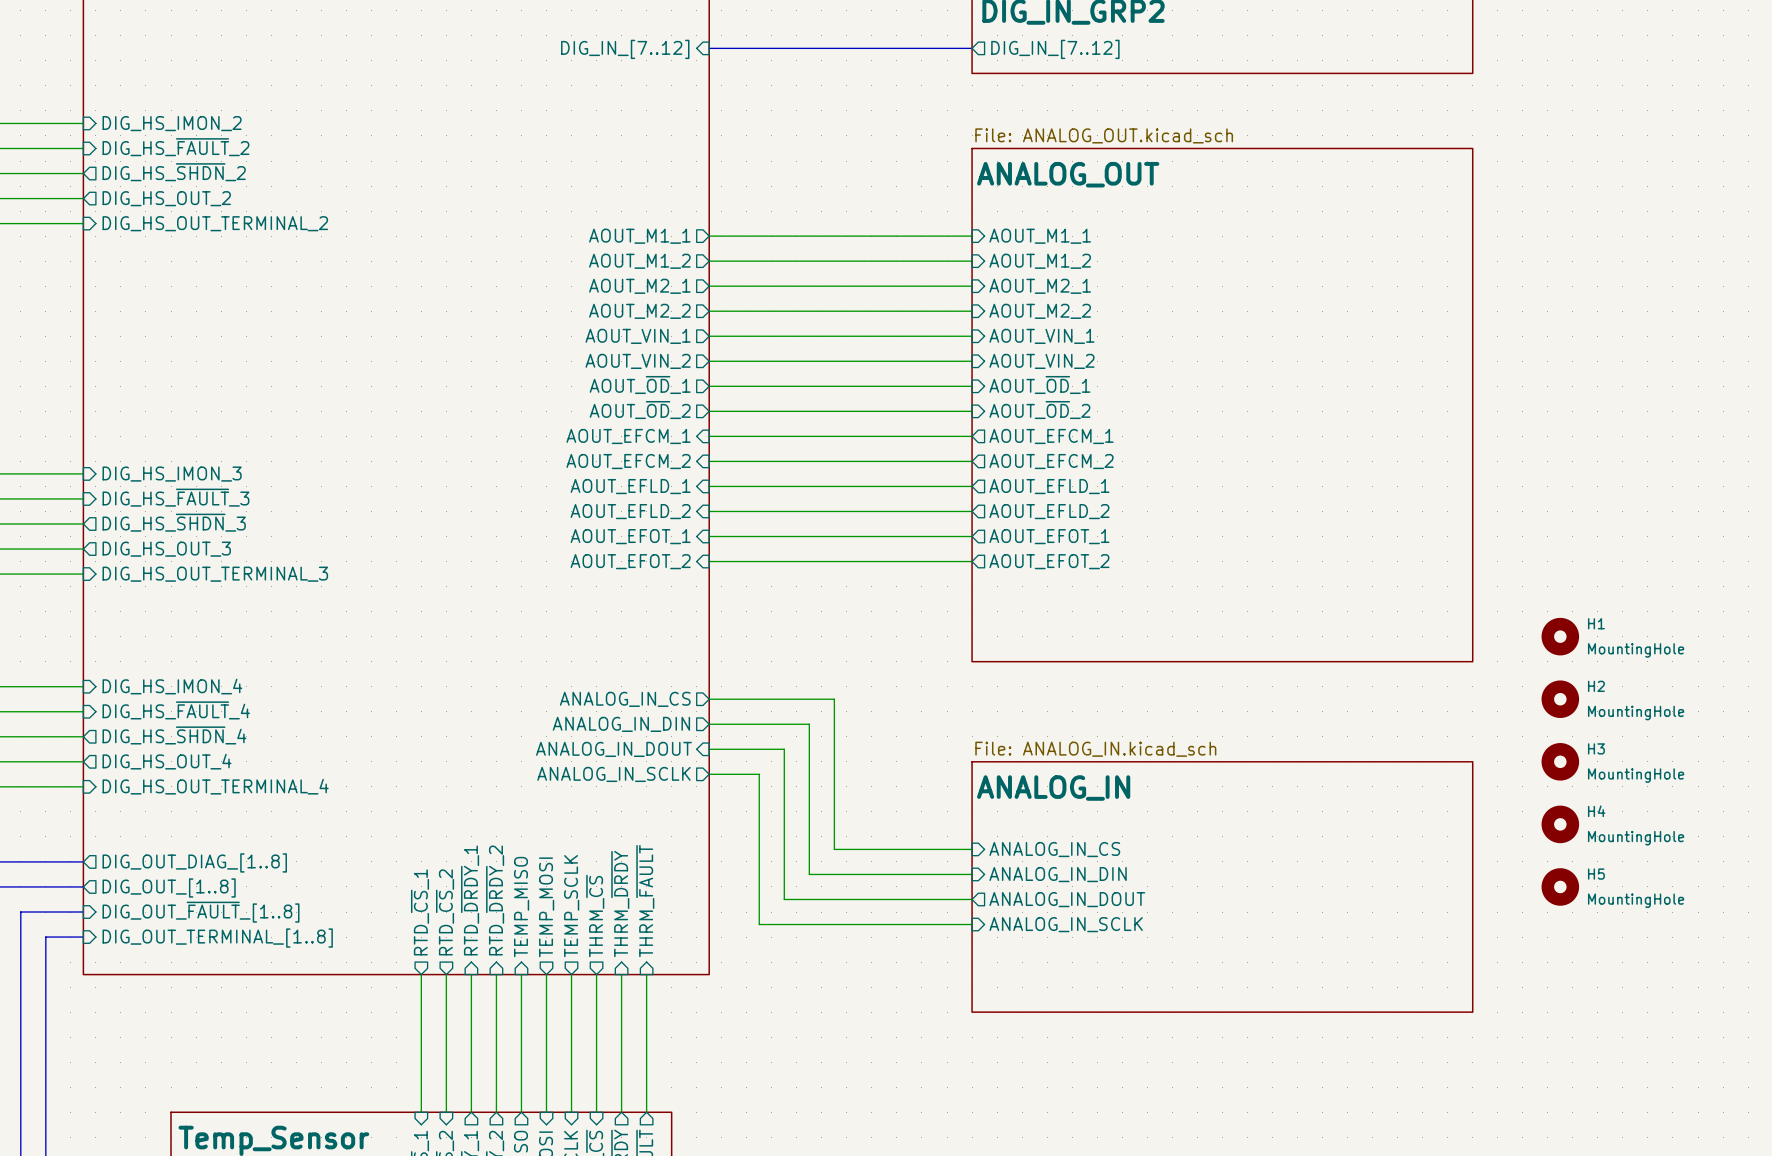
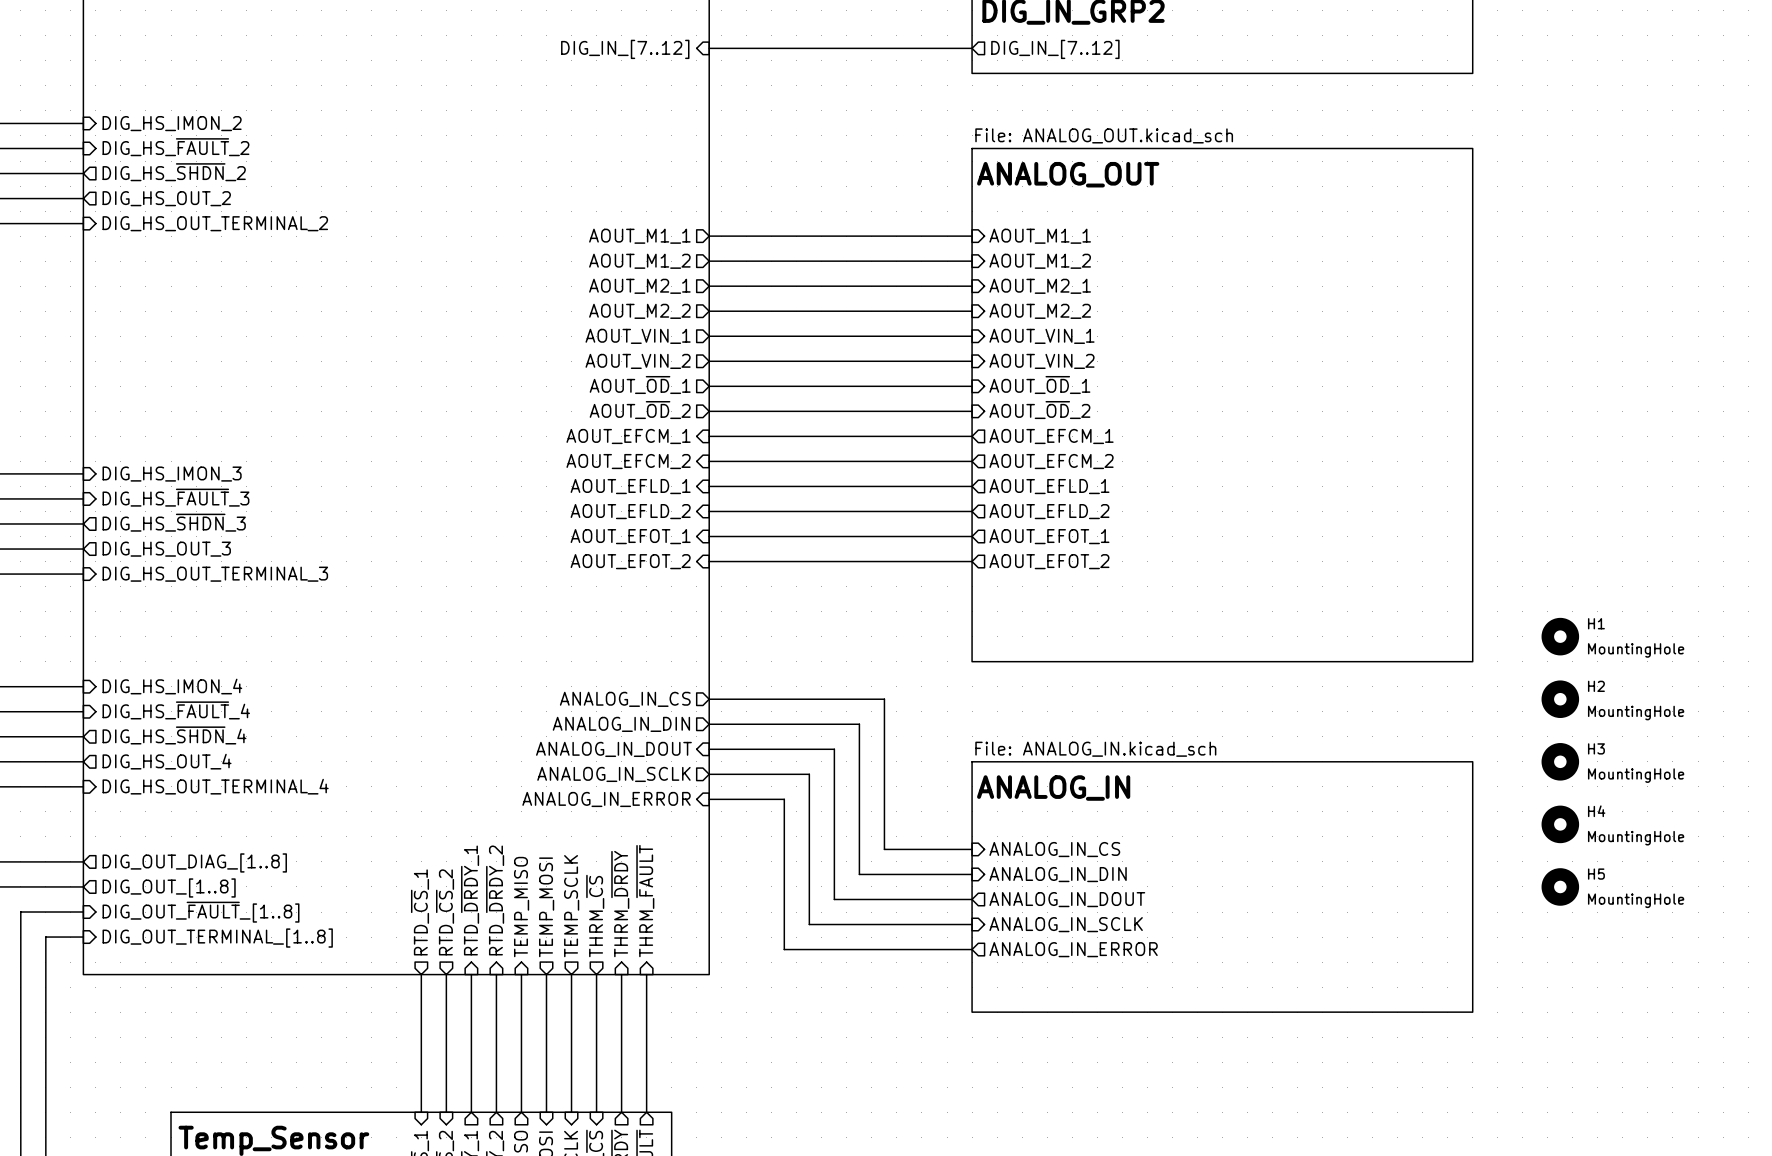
wire: (834, 699) (834, 749) -> (784, 749) (834, 749)
wire: (809, 724) (809, 774) -> (759, 774) (809, 774)
wire: none -> (809, 724) (859, 724) (859, 874)
wire: (784, 749) (784, 799) -> (709, 799) (784, 799)
wire: (759, 774) (759, 924) (809, 924) -> none
sheet pin: none -> ANALOG_IN_ERROR (606, 799)
wire: (834, 849) (884, 849) -> (834, 699) (884, 699) (884, 849)
wire: (809, 874) (859, 874) -> (809, 874) (809, 924)
wire: (784, 899) (834, 899) -> (834, 849) (834, 899)
wire: none -> (784, 899) (784, 949) (972, 949)
sheet pin: none -> ANALOG_IN_ERROR (1073, 949)

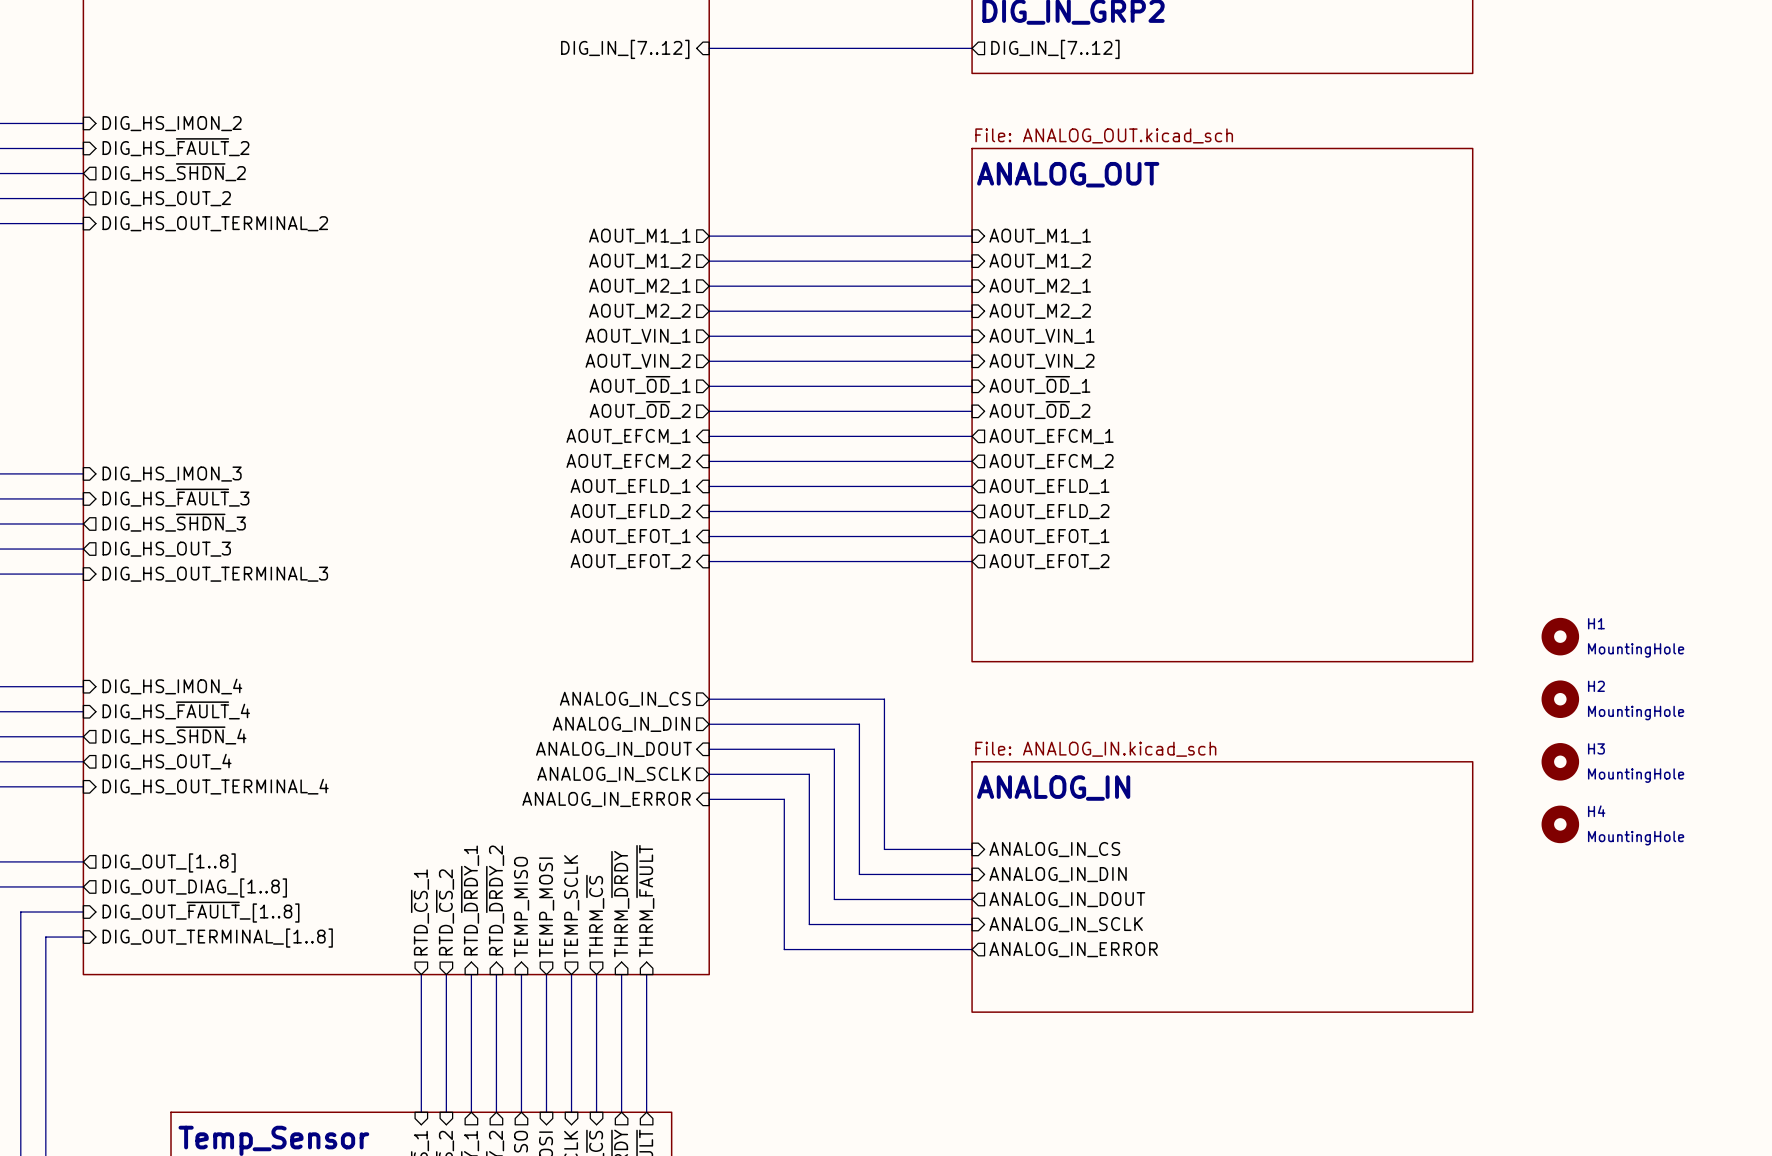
sheet pin: DIG_OUT_DIAG_[1..8] (194, 862) -> DIG_OUT_[1..8] (169, 862)
H5: MountingHole (1560, 886) -> none
sheet pin: DIG_OUT_[1..8] (169, 887) -> DIG_OUT_DIAG_[1..8] (194, 887)

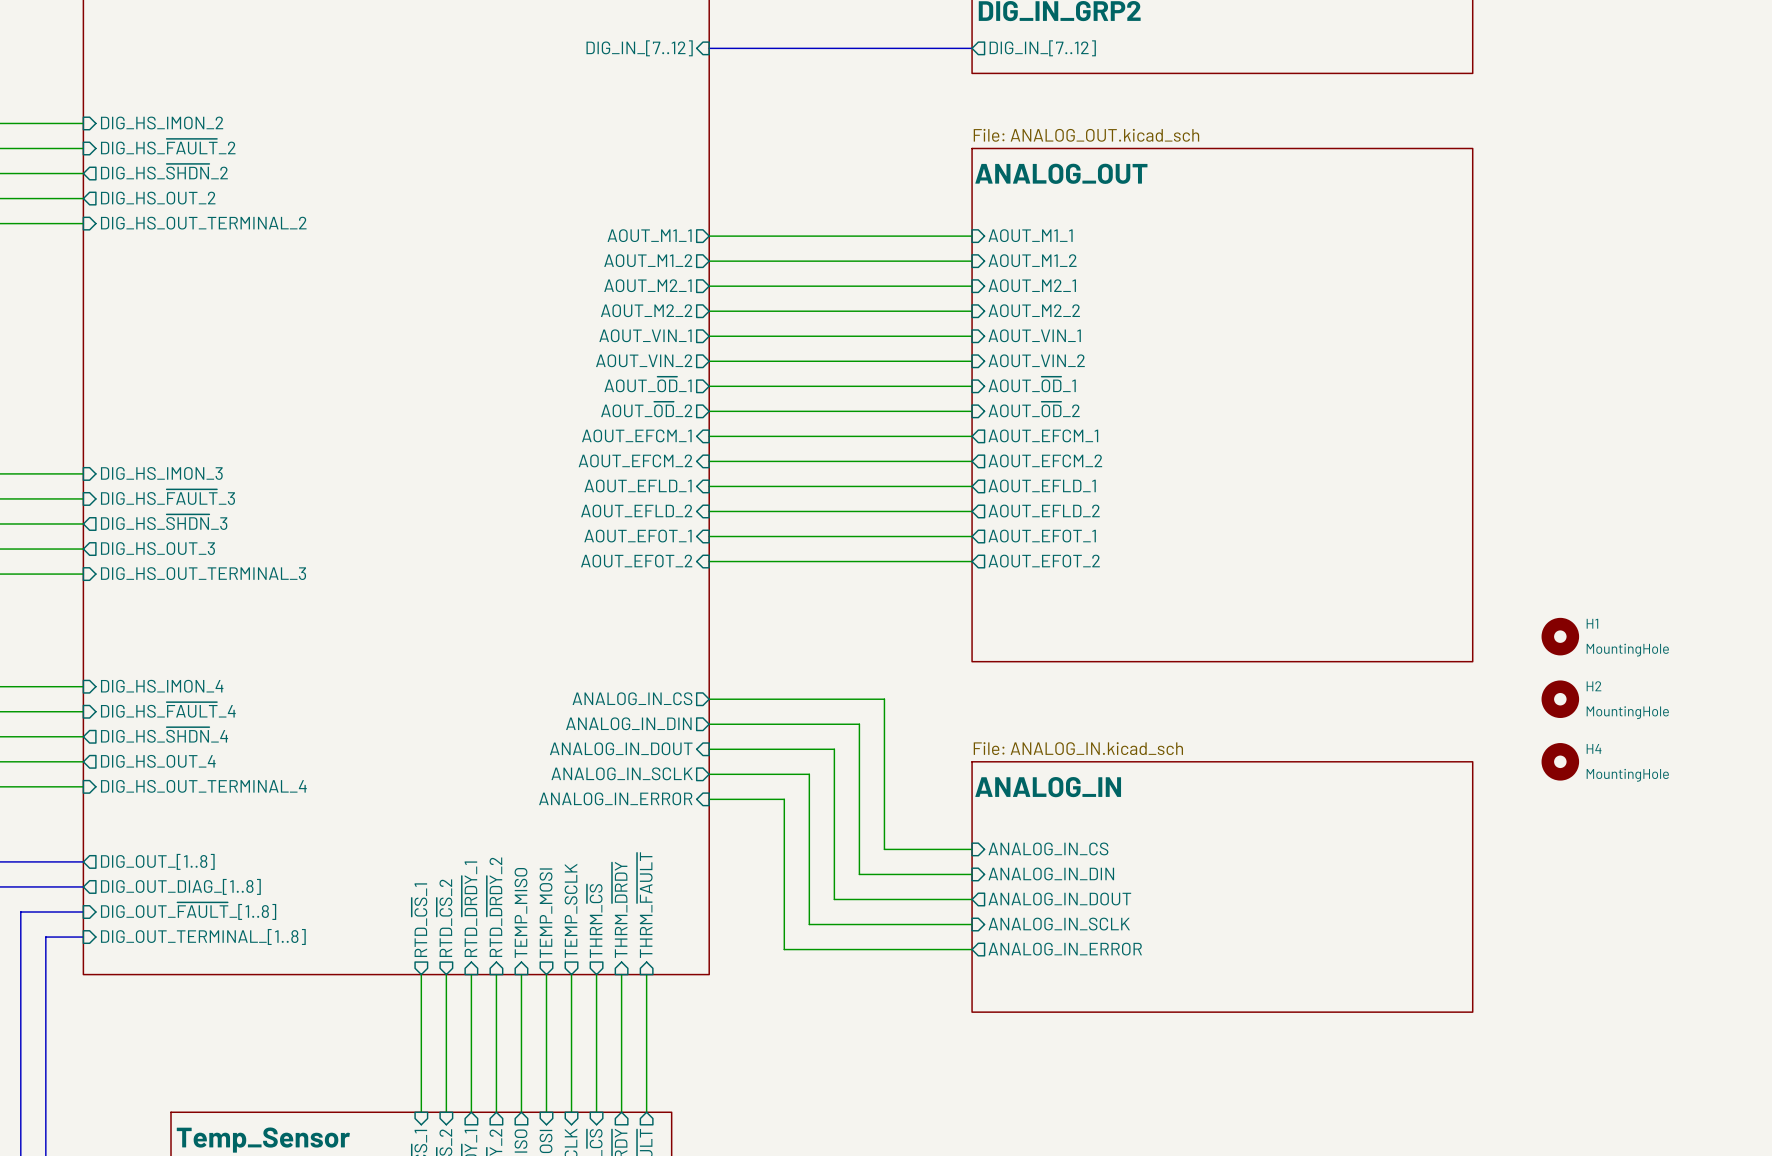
H3 name: H3 (1596, 748) -> H4 (1594, 748)
H4: MountingHole (1560, 824) -> none

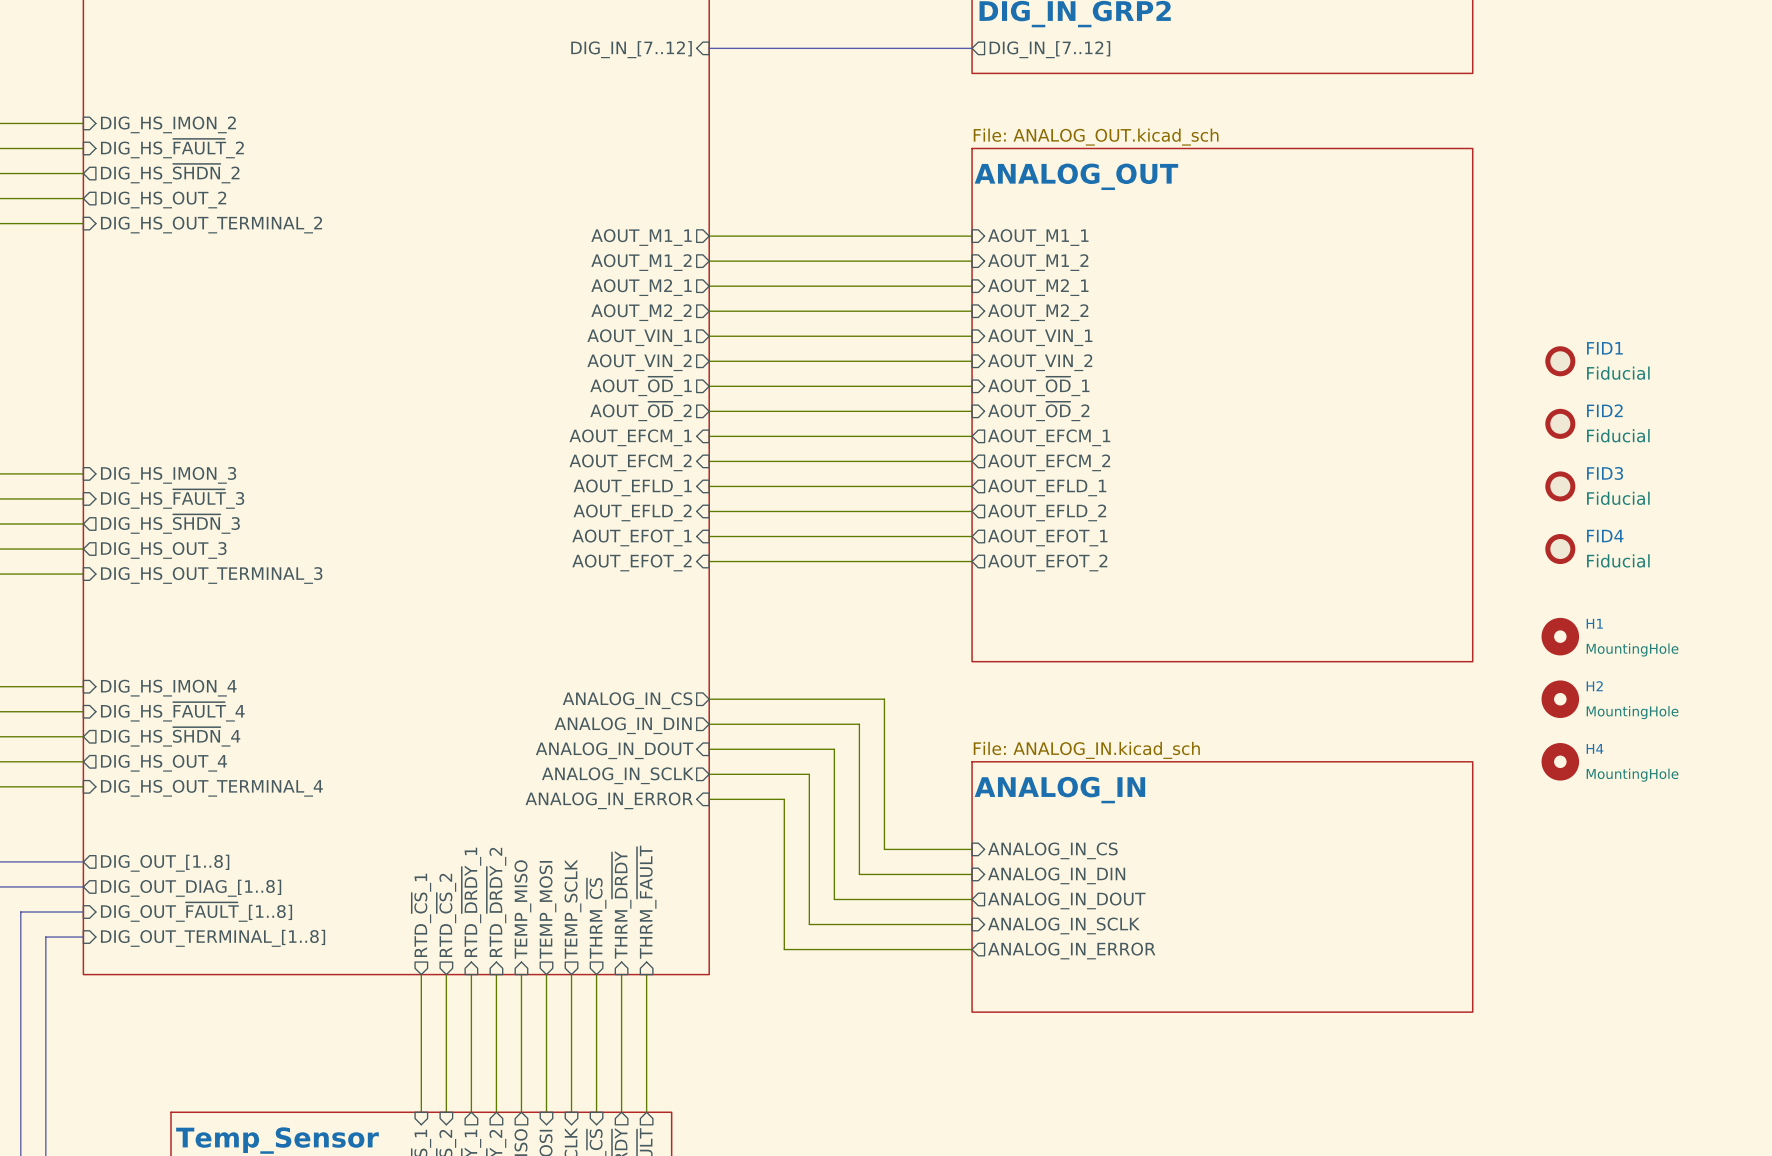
FID1: none -> Fiducial (1560, 361)
FID2: none -> Fiducial (1560, 423)
FID3: none -> Fiducial (1560, 486)
FID4: none -> Fiducial (1560, 549)

